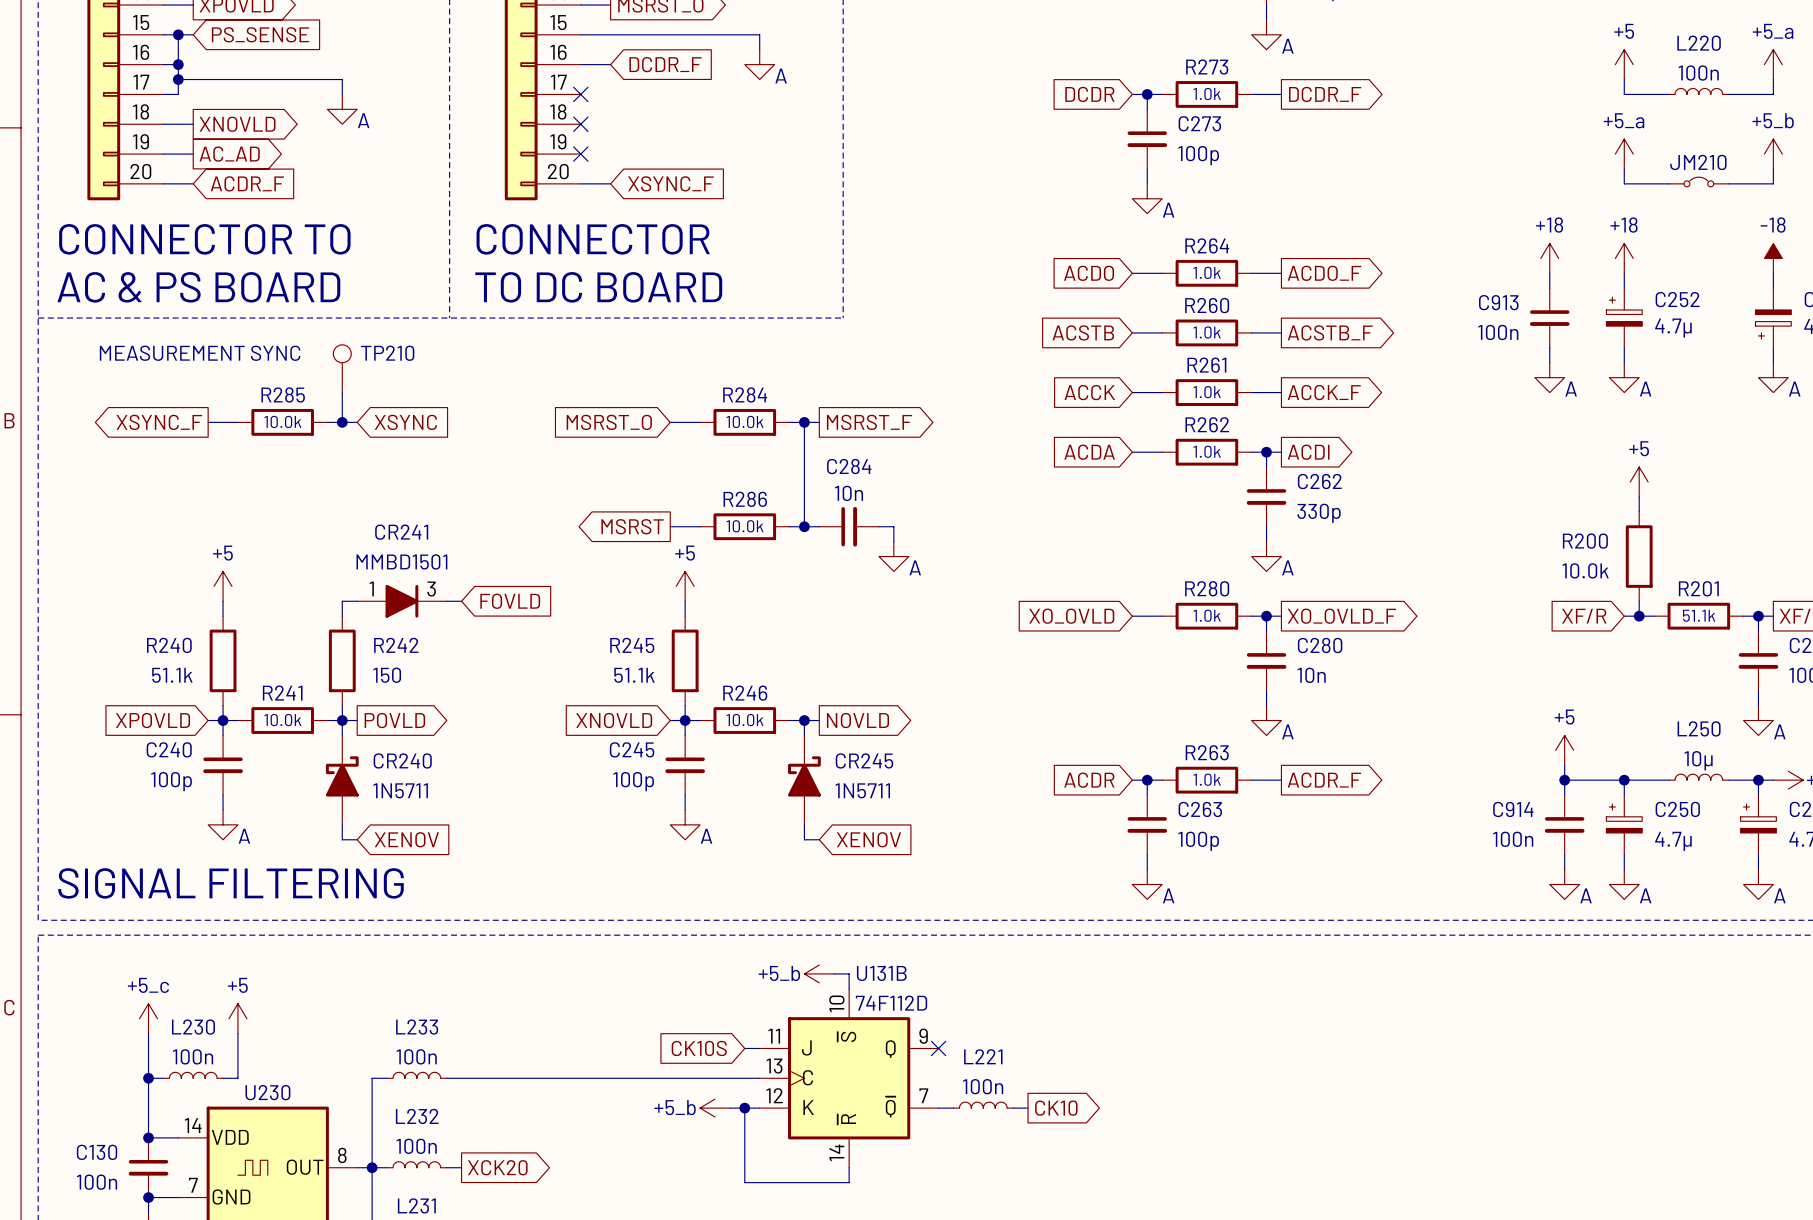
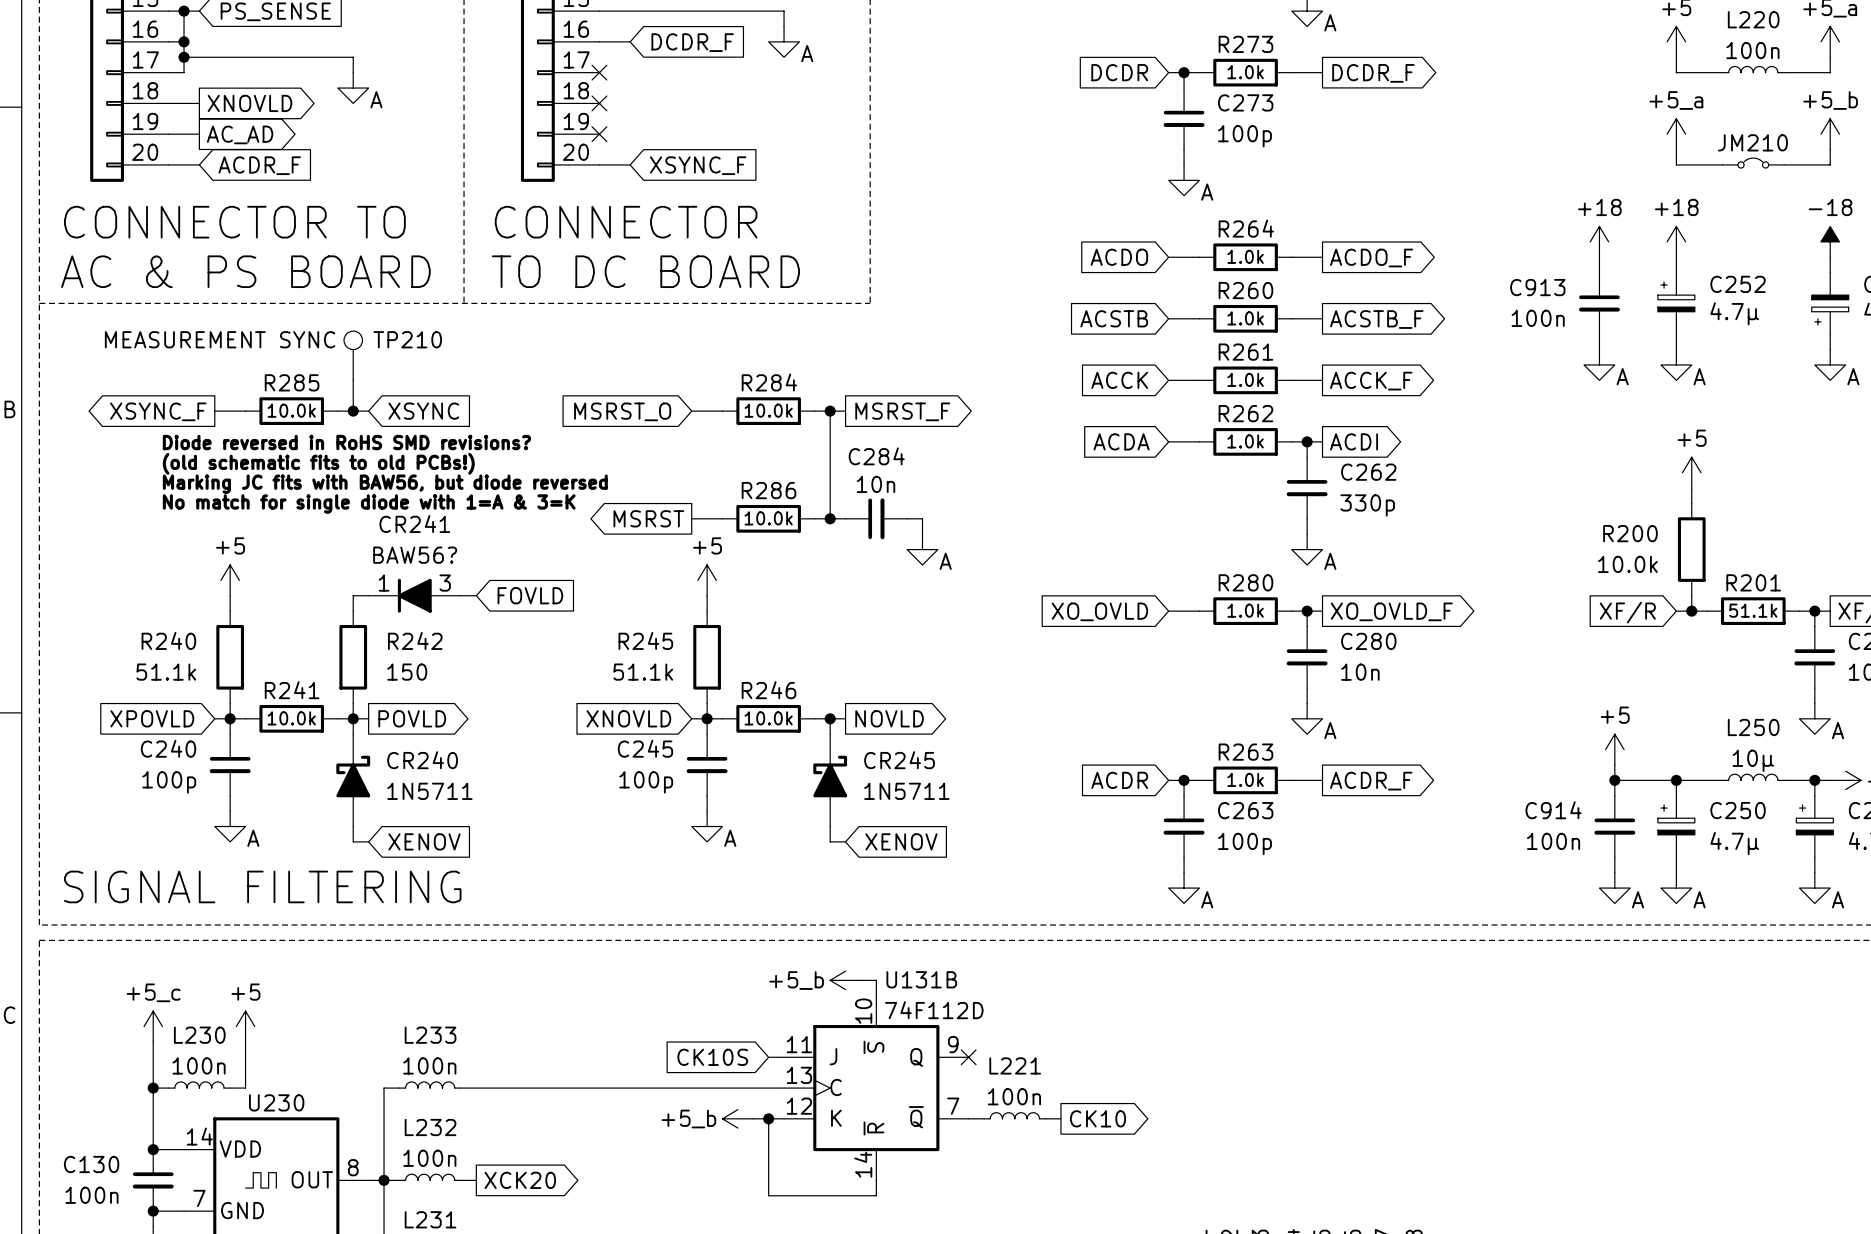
text: none -> Diode reversed in RoHS SMD revisions? (346, 442)
text: none -> (old schematic fits to old PCBs!) (318, 463)
text: none -> Marking JC fits with BAW56, but diode reversed (385, 484)
text: none -> No match for single diode with 1=A & 3=K (369, 504)
CR241 value: MMBD1501 (401, 561) -> BAW56? (415, 555)
CR241 symbol: [357, 584, 447, 618] -> [368, 578, 461, 613]

